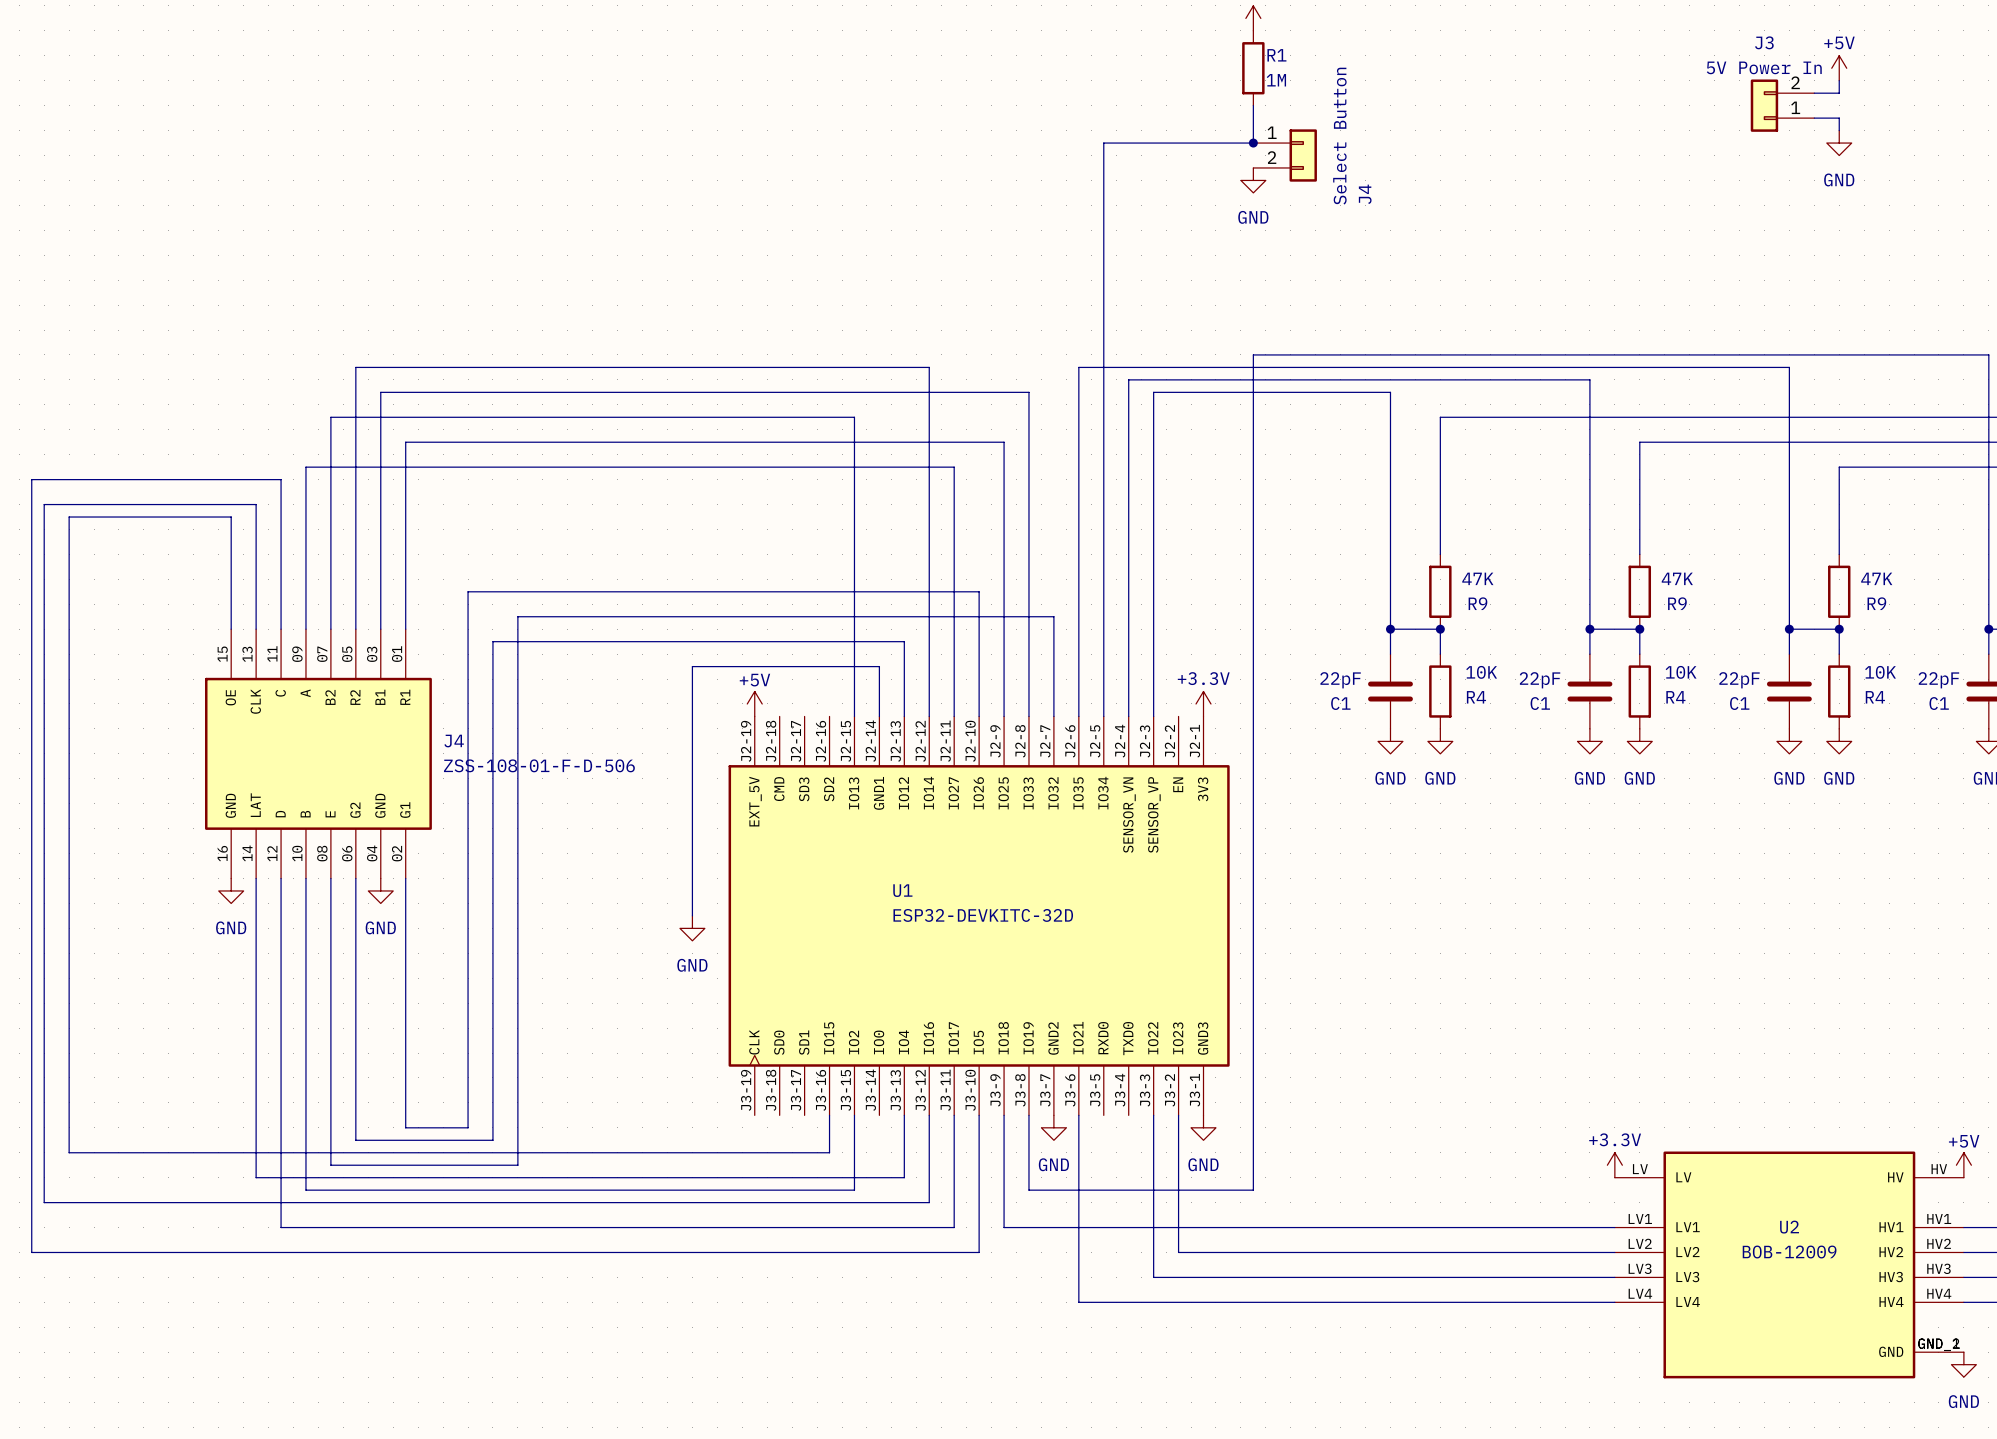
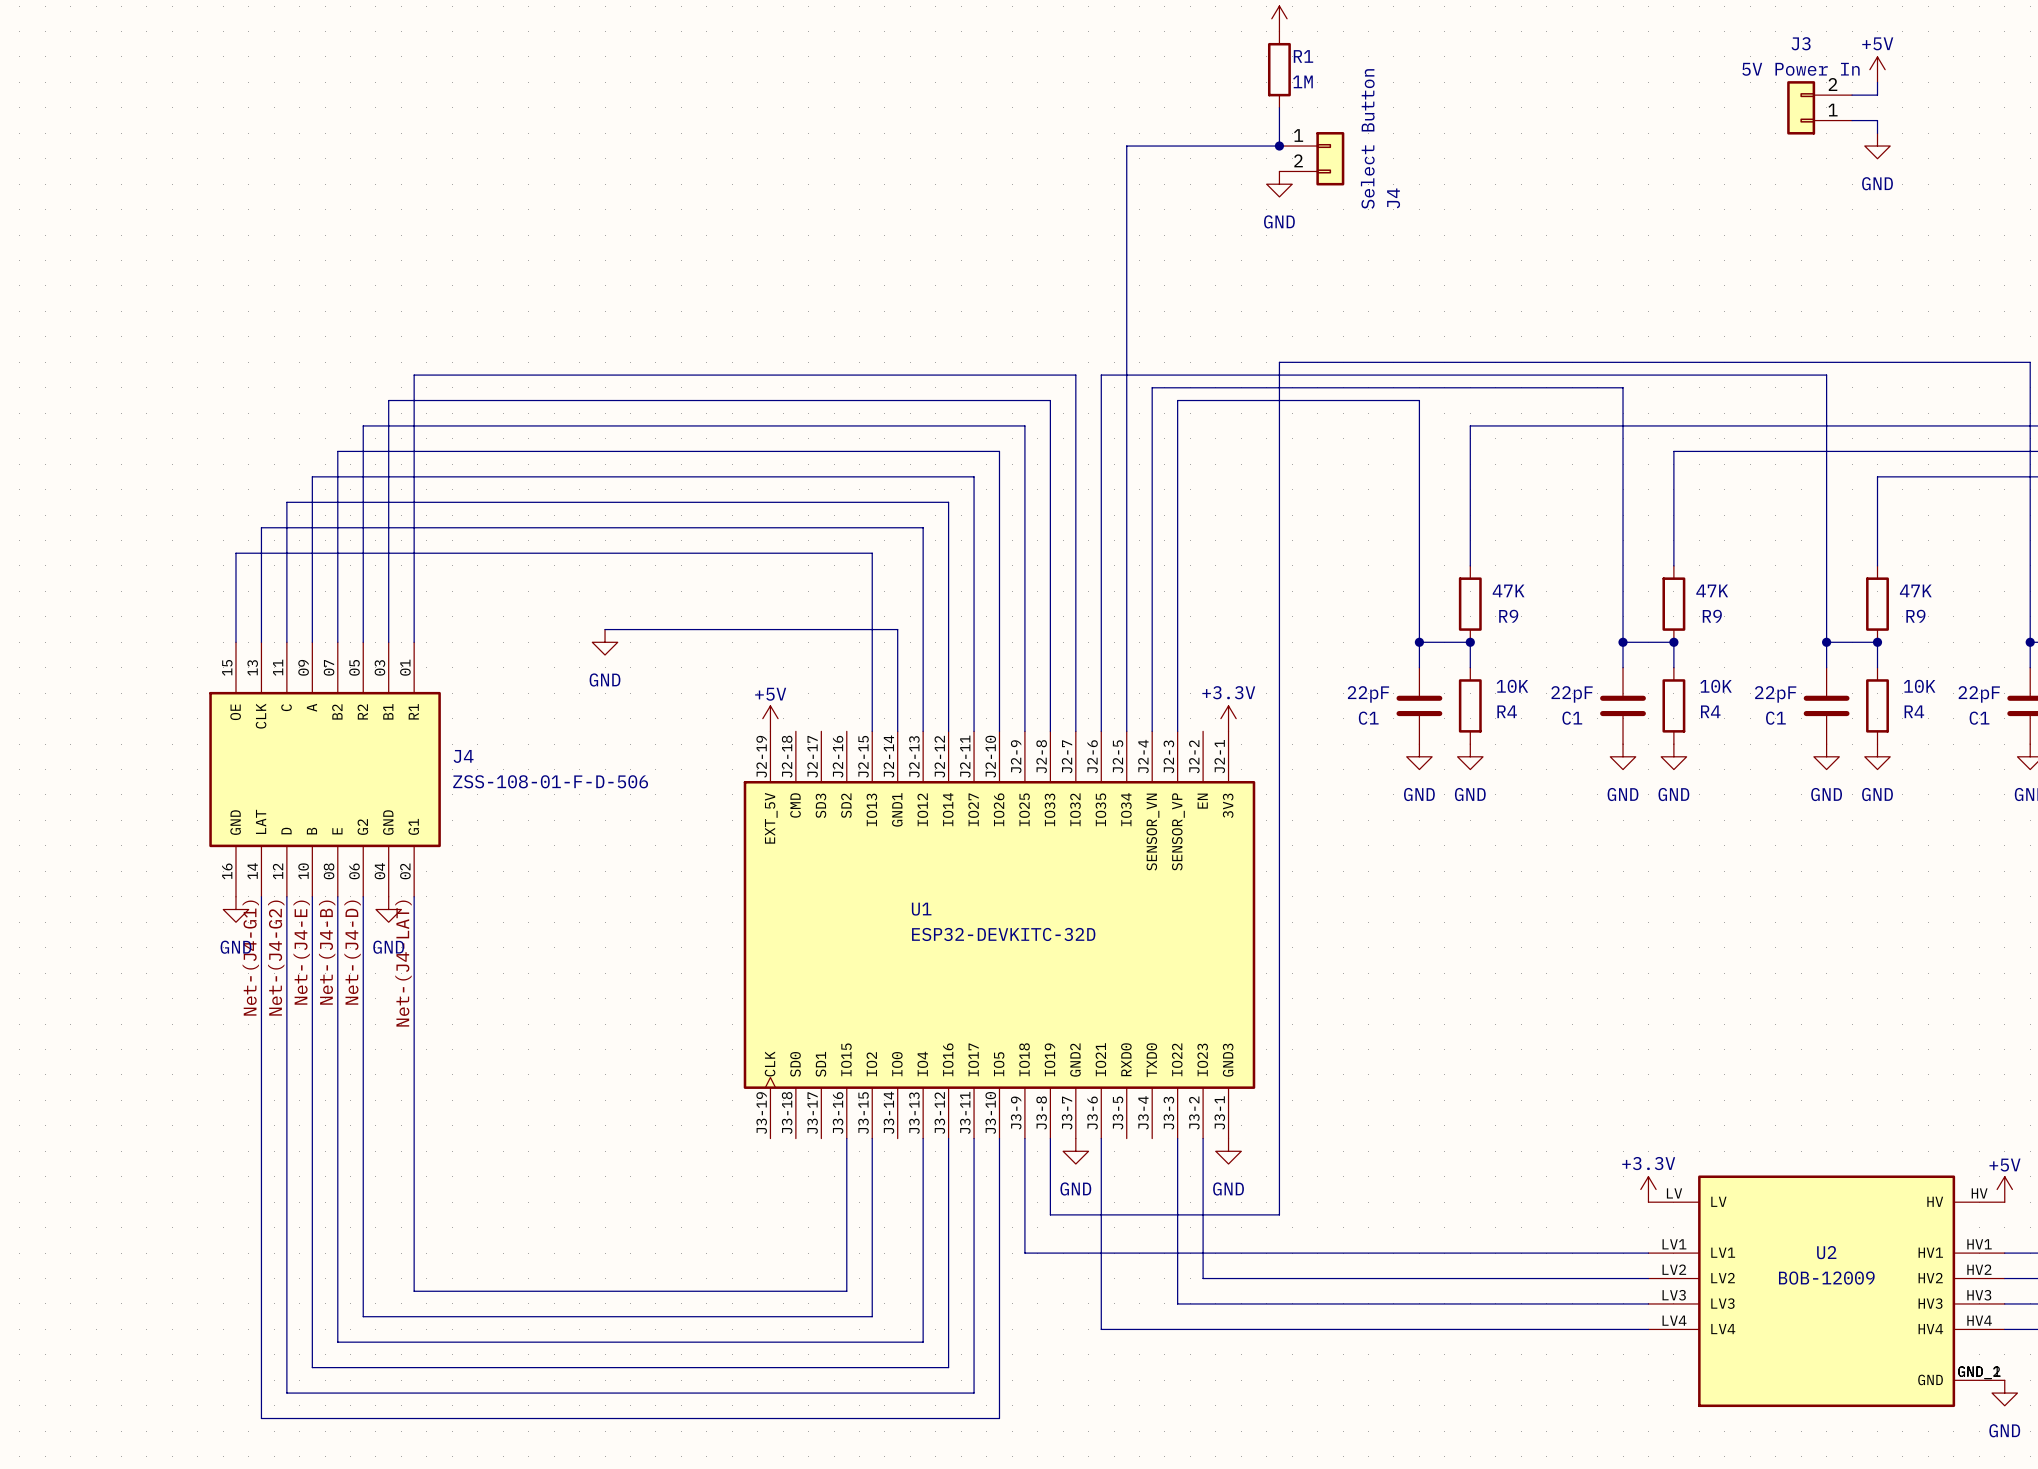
wire: (405, 367) (355, 367) (355, 417) (330, 417) (330, 442) -> (414, 375) (414, 451) (337, 451)
wire: (929, 367) (929, 492) -> (948, 375) (1075, 375) (1075, 629)
wire: (854, 417) (854, 541) -> none
wire: (979, 442) (1004, 442) -> (872, 425) (1024, 425) (1024, 451)
wire: none -> (999, 451) (999, 604)
wire: (281, 492) (281, 479) (31, 479) (31, 1252) (979, 1252) -> (261, 1202) (261, 1418) (999, 1418) (999, 1278)
wire: none -> (286, 502) (948, 502)
wire: (256, 517) (256, 504) (44, 504) (44, 1202) (929, 1202) -> (261, 527) (923, 527) (923, 655)
wire: (231, 541) (231, 517) (69, 517) (69, 1152) (829, 1152) -> (235, 553) (872, 553)
wire: (979, 591) (468, 591) (468, 1127) (405, 1127) -> (846, 1176) (846, 1291) (414, 1291) (414, 1151)
wire: (592, 616) (517, 616) (517, 1165) (330, 1165) -> none
wire: (879, 616) (1053, 616) -> (897, 629) (897, 680)
power symbol: none -> GND (605, 642)
wire: (904, 641) (492, 641) (492, 1140) (355, 1140) -> none
wire: (879, 666) (692, 666) (692, 915) -> none
power symbol: GND (692, 928) -> none
label: none -> Net-(J4-E) (301, 952)
label: none -> Net-(J4-B) (327, 952)
label: none -> Net-(J4-D) (352, 952)
label: none -> Net-(J4-G1) (250, 958)
label: none -> Net-(J4-G2) (276, 958)
label: none -> Net-(J4-LAT) (403, 963)
wire: (256, 1177) (904, 1177) -> (337, 1189) (337, 1342) (923, 1342) (923, 1202)
wire: (305, 1190) (854, 1190) -> (363, 1164) (363, 1316) (872, 1316) (872, 1214)
wire: none -> (312, 1214) (312, 1367) (948, 1367) (948, 1227)
wire: (281, 1227) (954, 1227) -> (286, 1253) (286, 1393) (974, 1393) (974, 1253)

